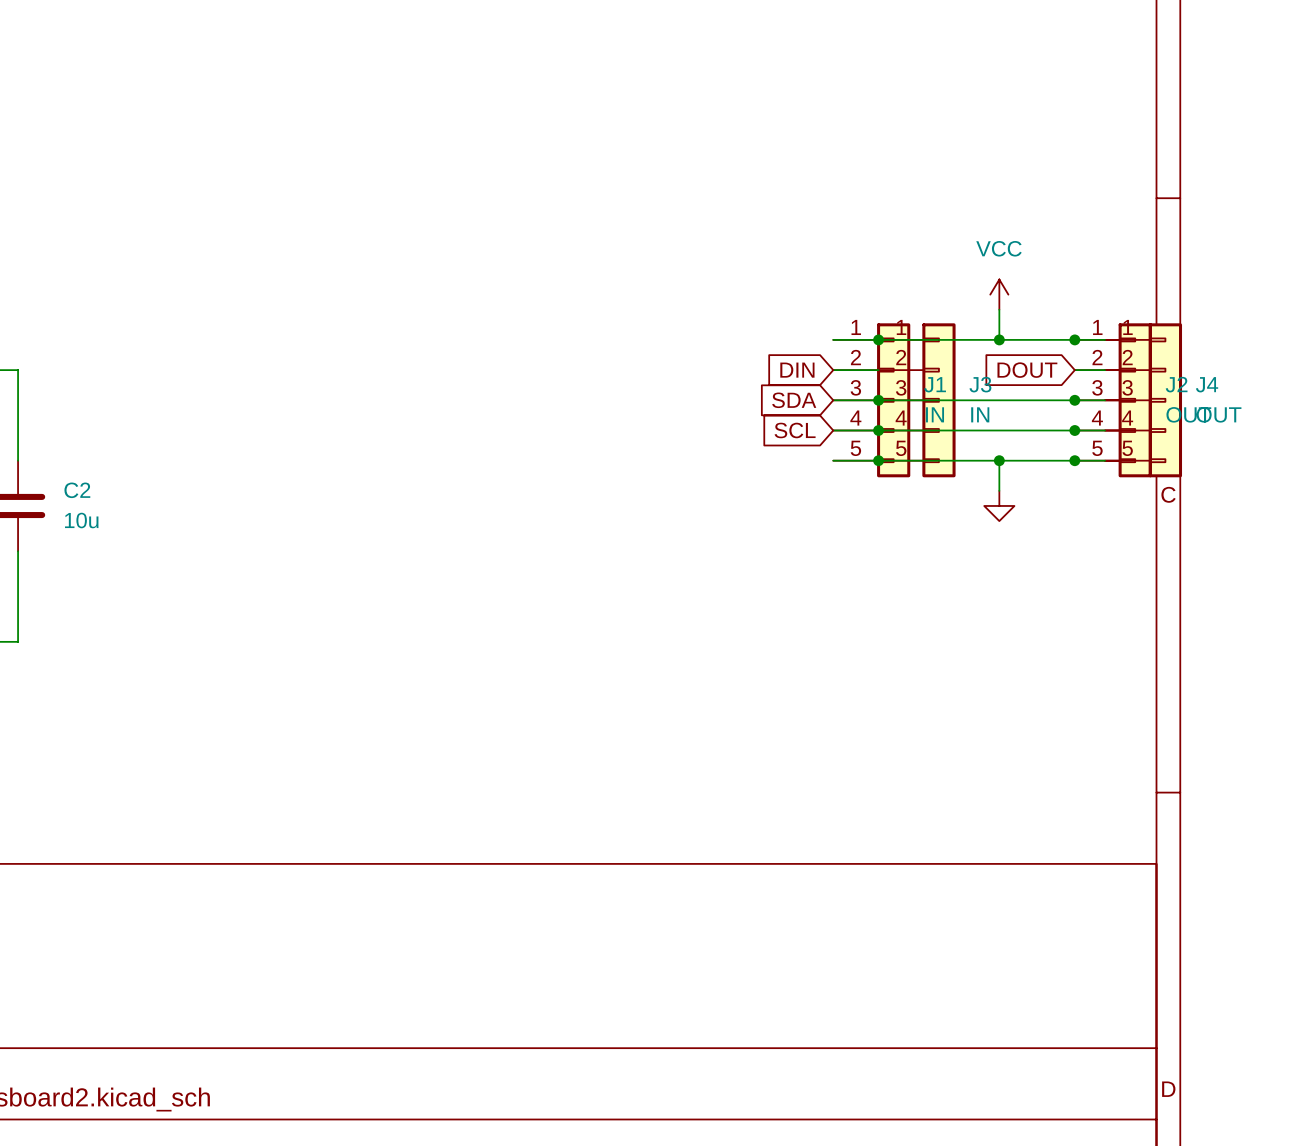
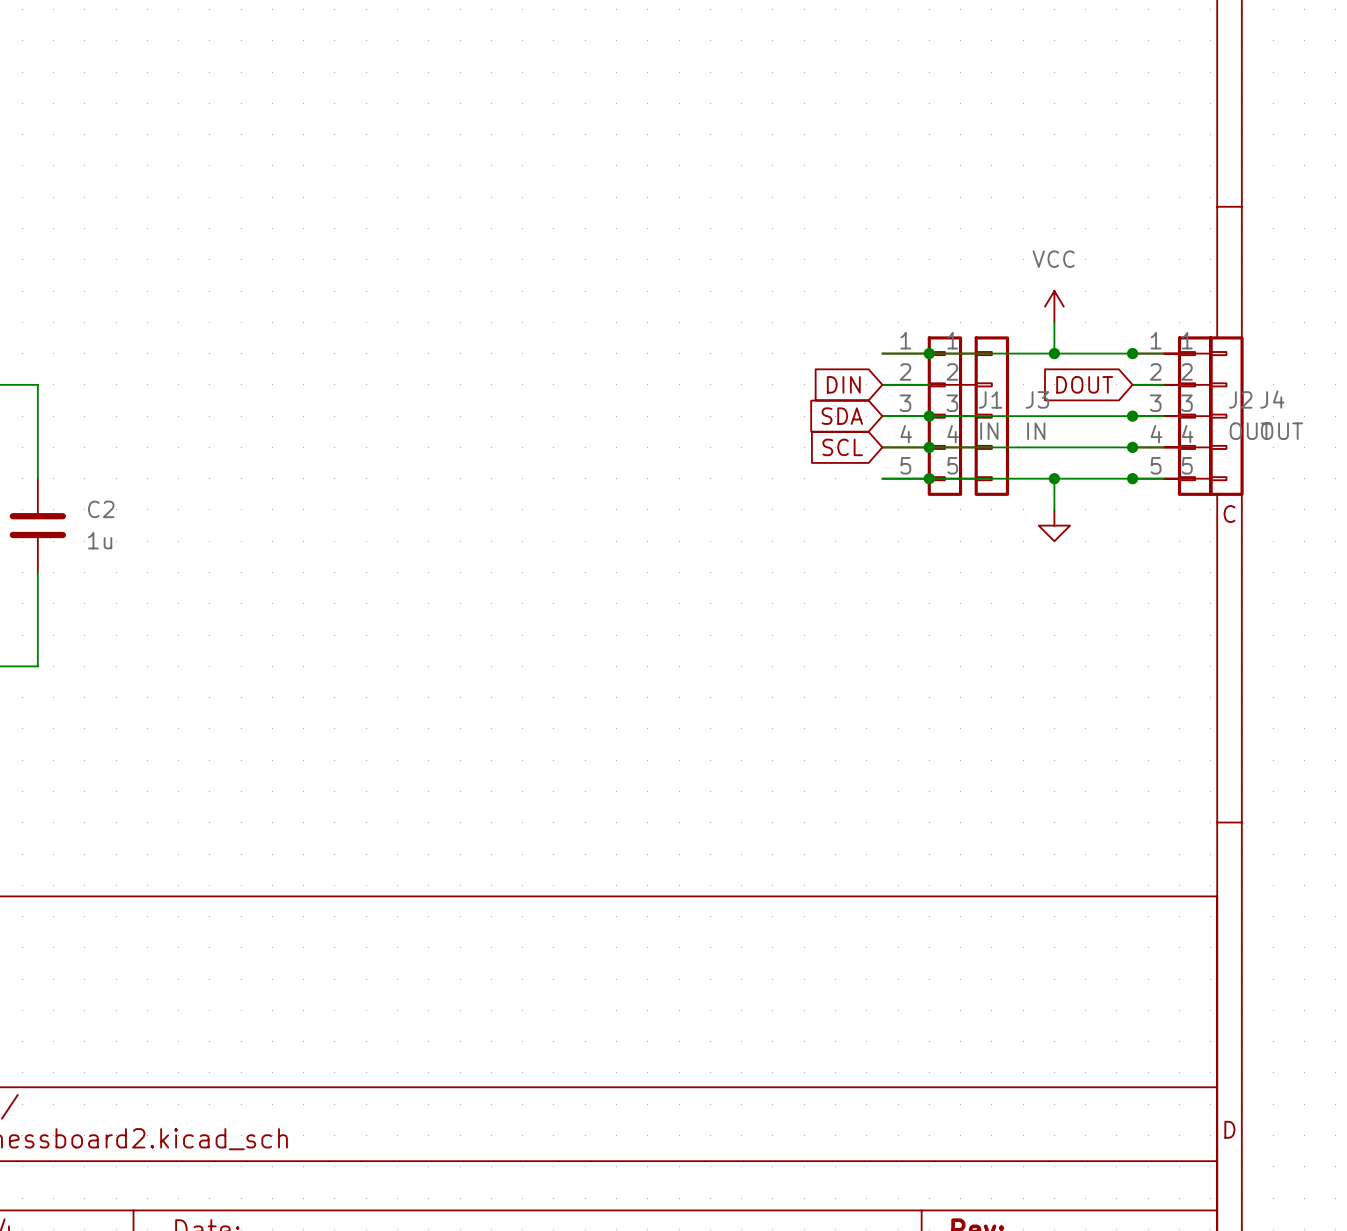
C2 value: 10u (81, 520) -> 1u (100, 540)

